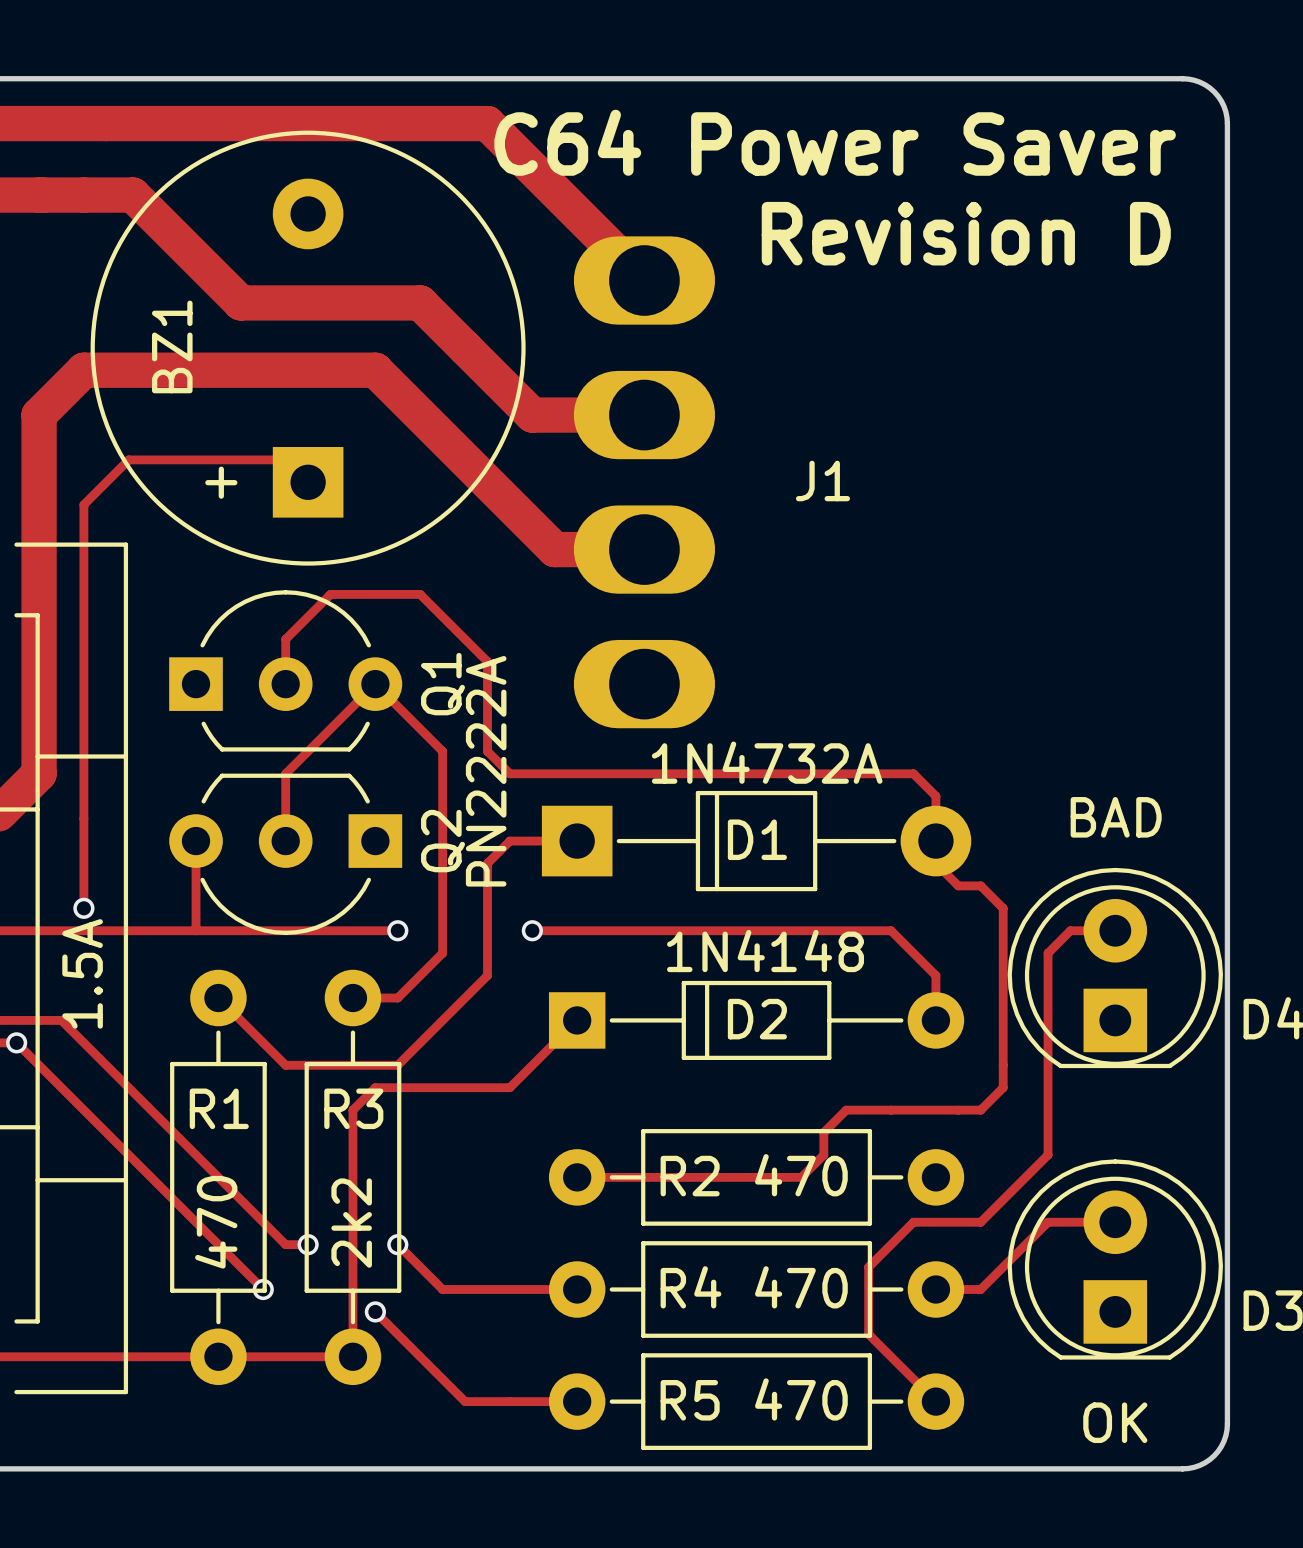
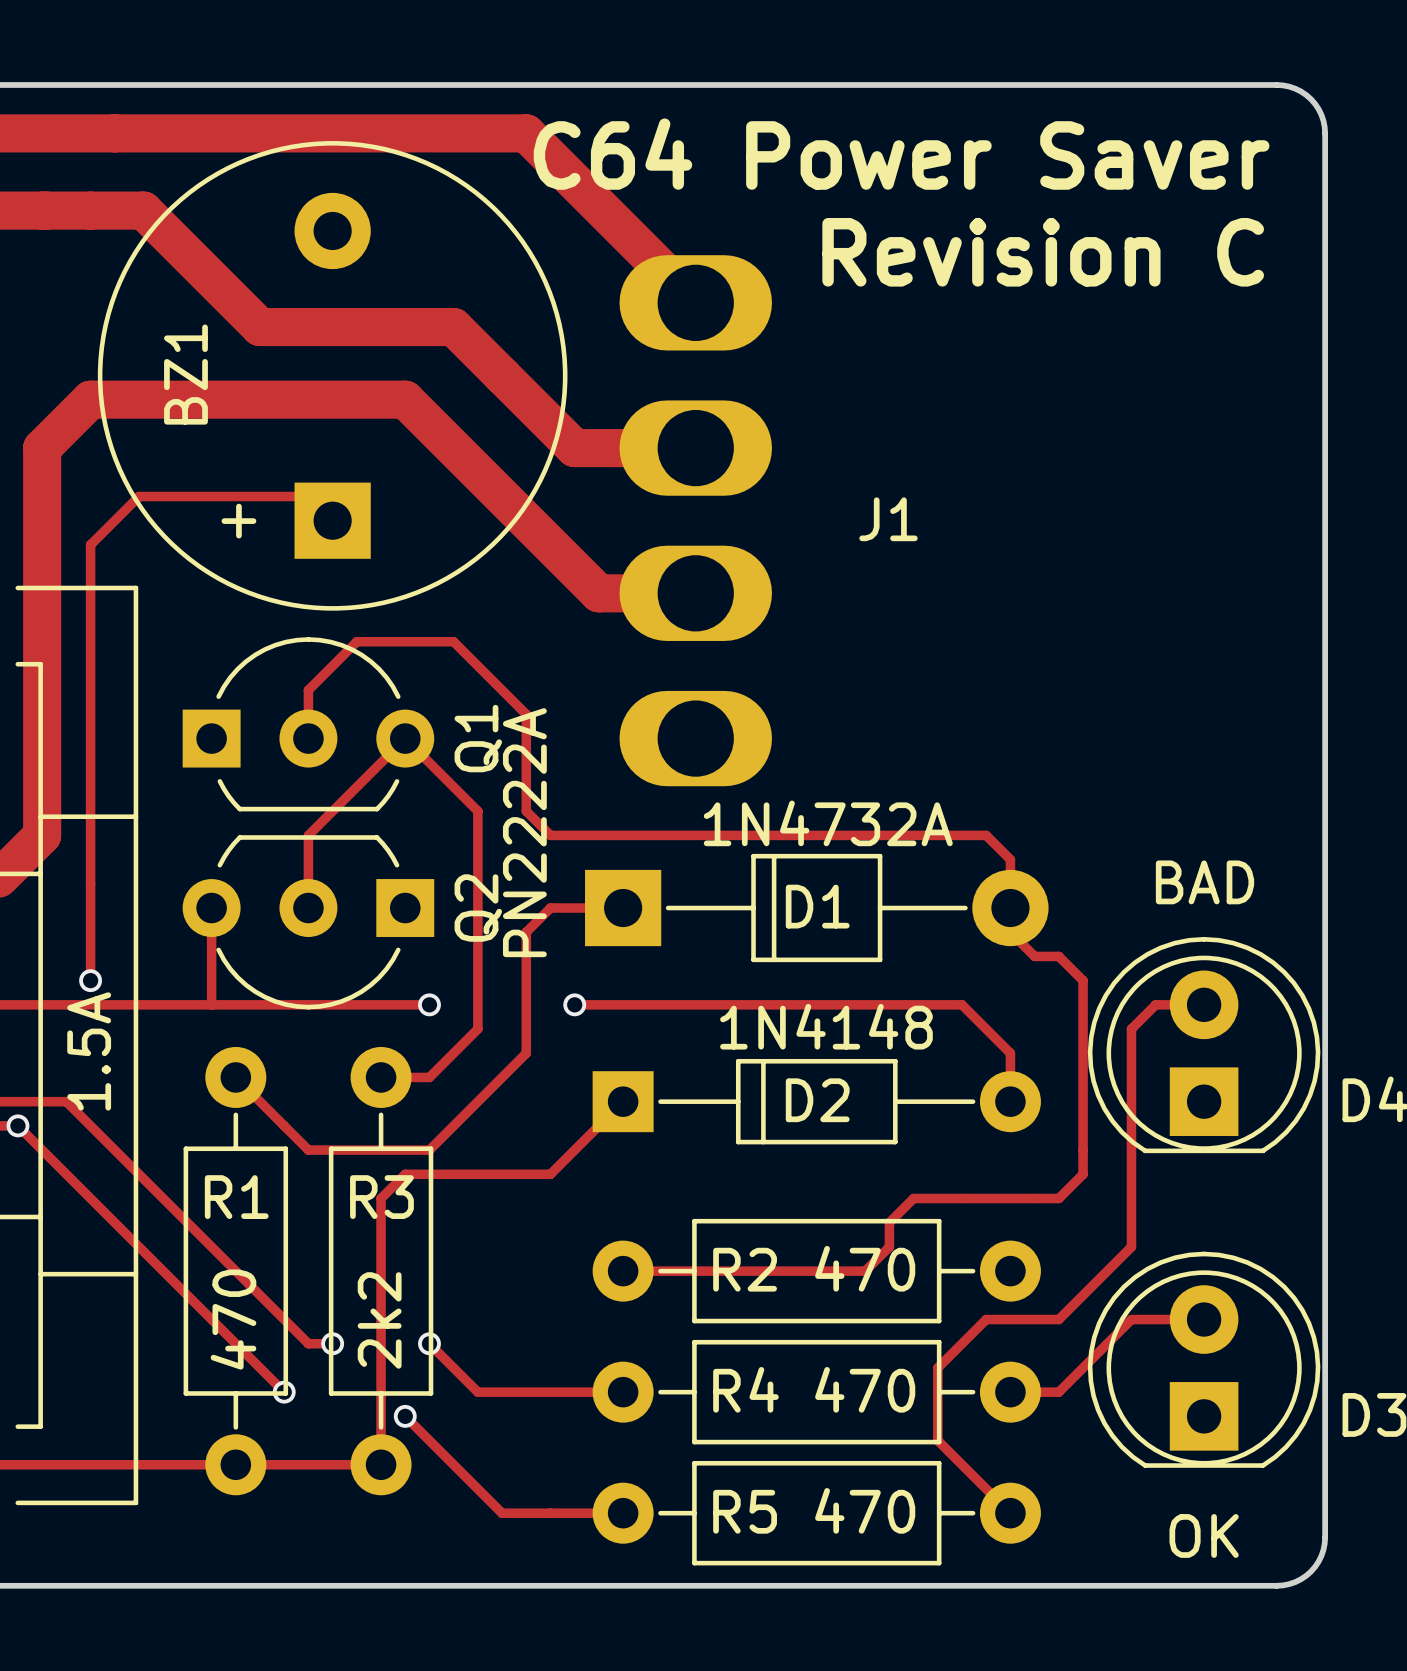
text: Revision D (966, 233) -> Revision C (1043, 252)

